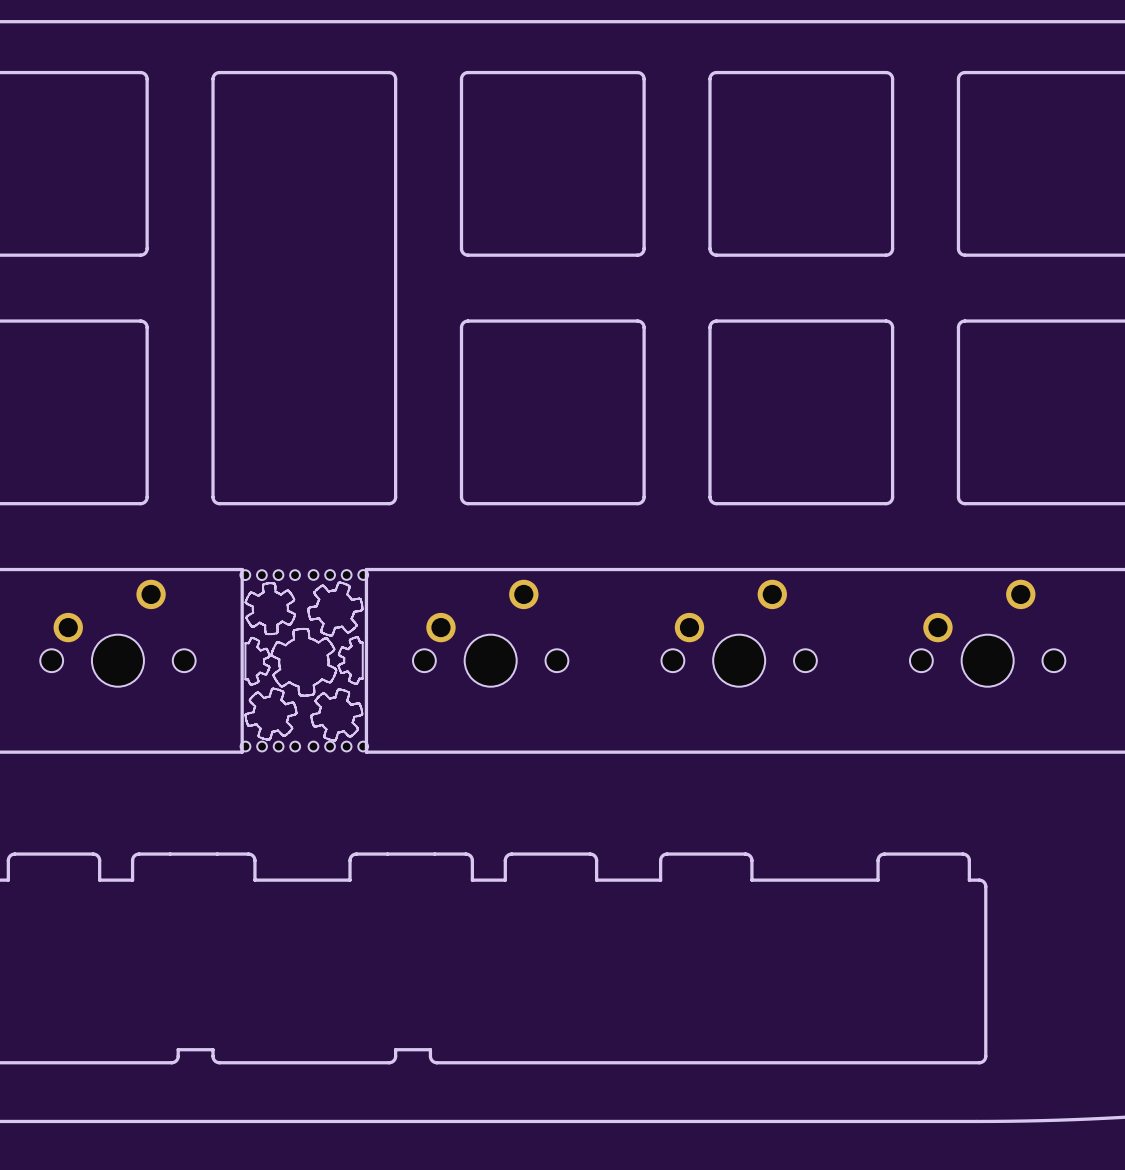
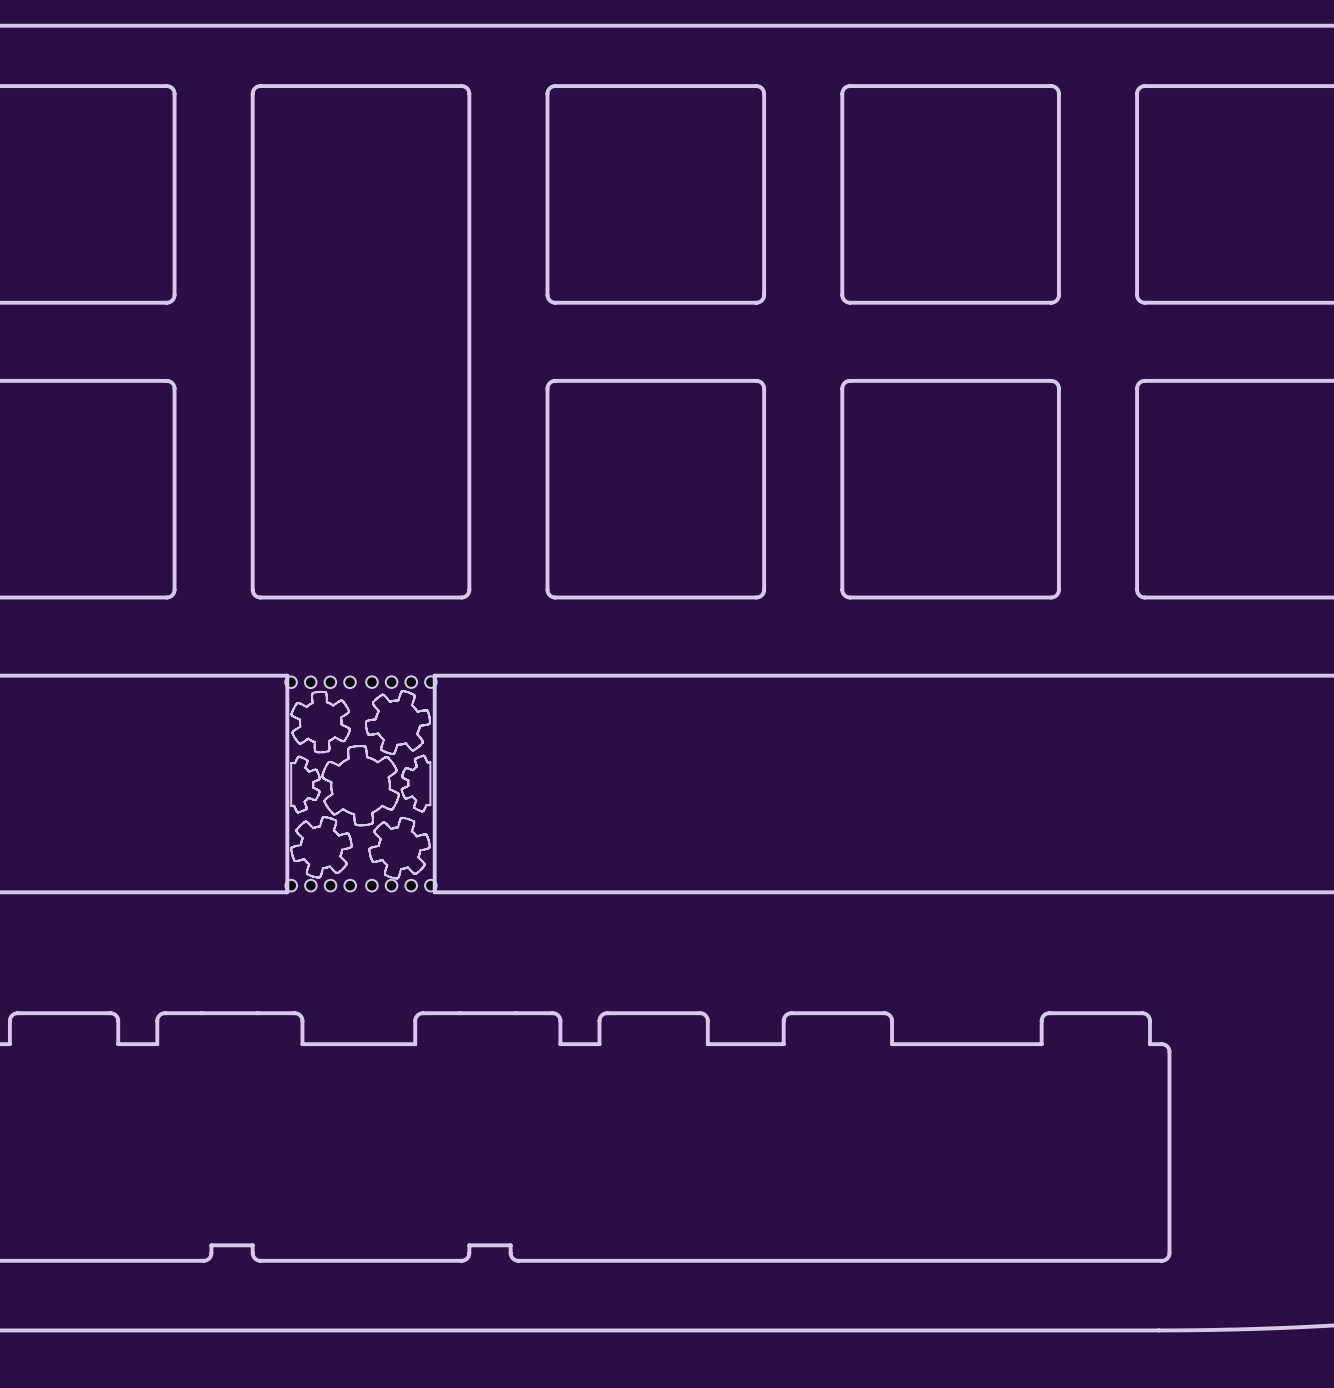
part: (117, 633) -> none
part: (490, 633) -> none
part: (739, 633) -> none
part: (987, 633) -> none

